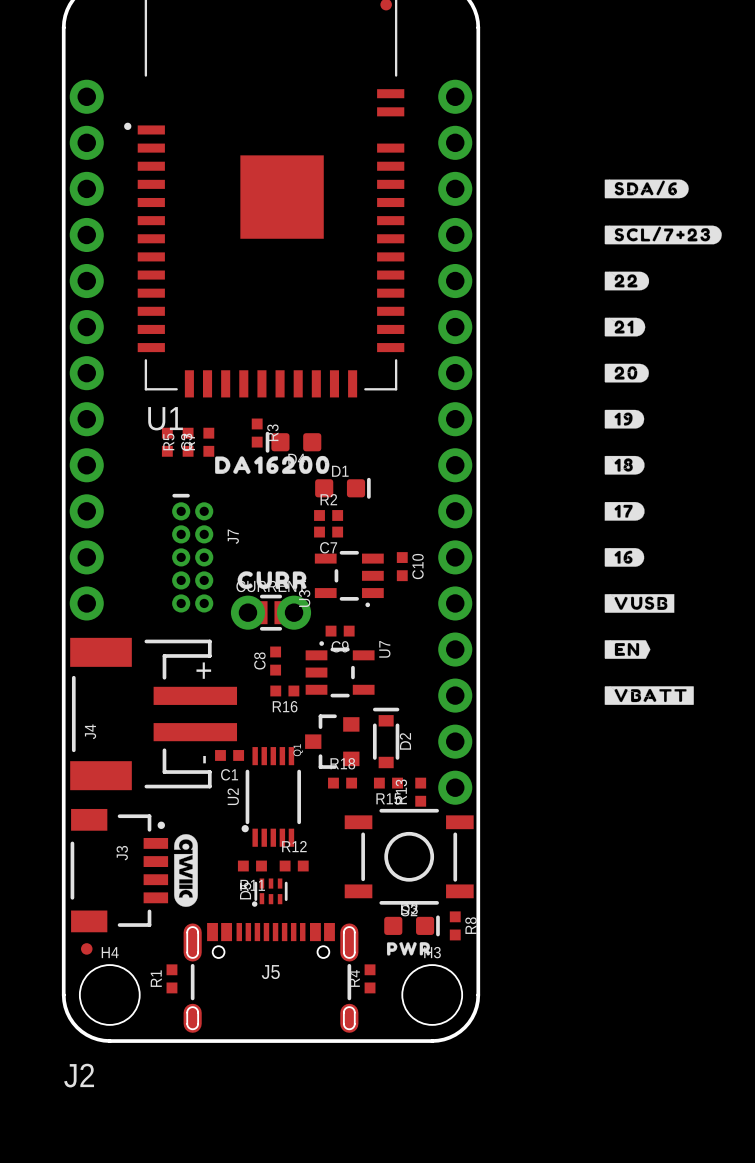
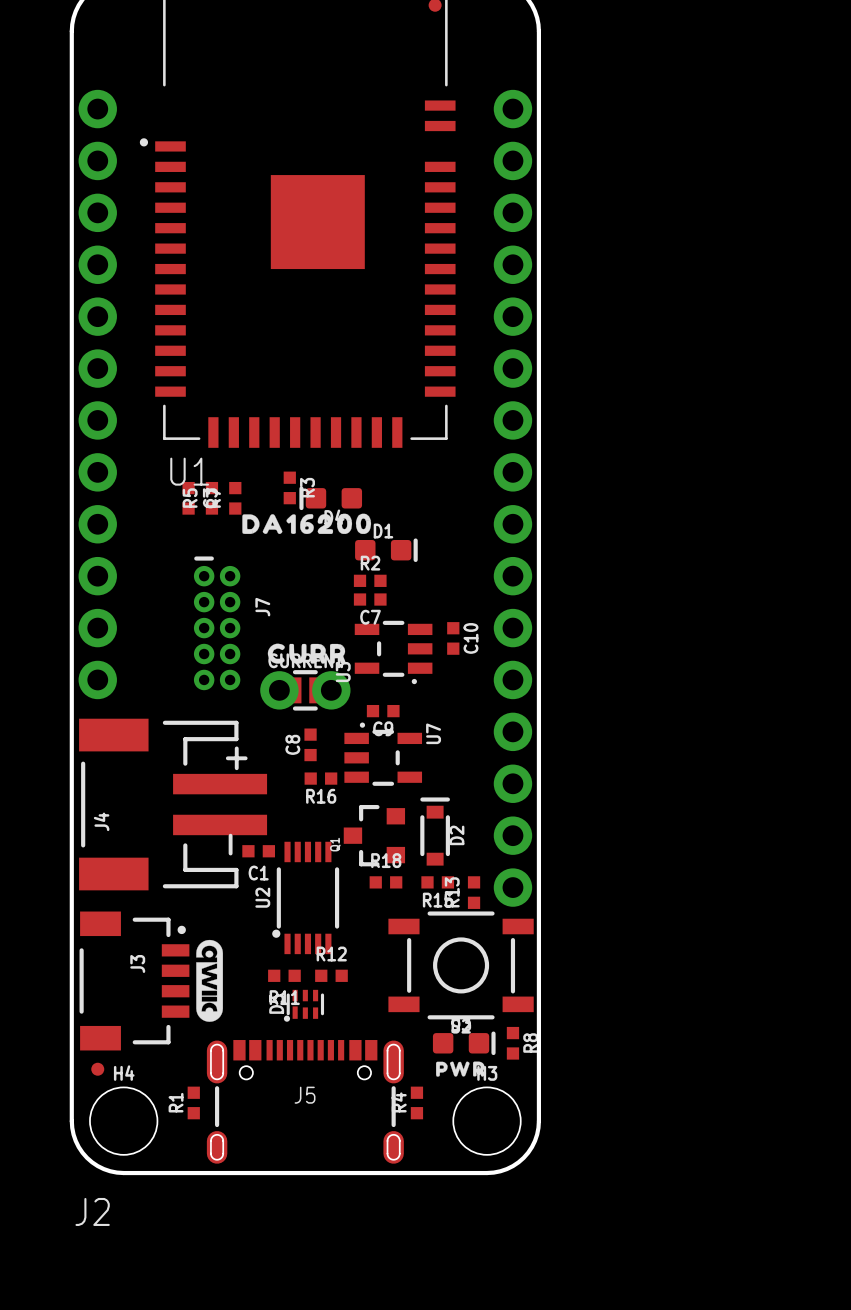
drawing: [604, 179, 689, 199] -> none
drawing: [604, 225, 722, 245] -> none
drawing: [604, 271, 650, 291] -> none
drawing: [604, 317, 646, 337] -> none
drawing: [604, 363, 649, 383] -> none
drawing: [604, 409, 645, 429] -> none
drawing: [604, 455, 645, 475] -> none
drawing: [604, 502, 645, 521] -> none
drawing: [604, 548, 645, 567] -> none
drawing: [604, 594, 675, 613] -> none
drawing: [604, 640, 651, 659] -> none
drawing: [604, 686, 694, 705] -> none

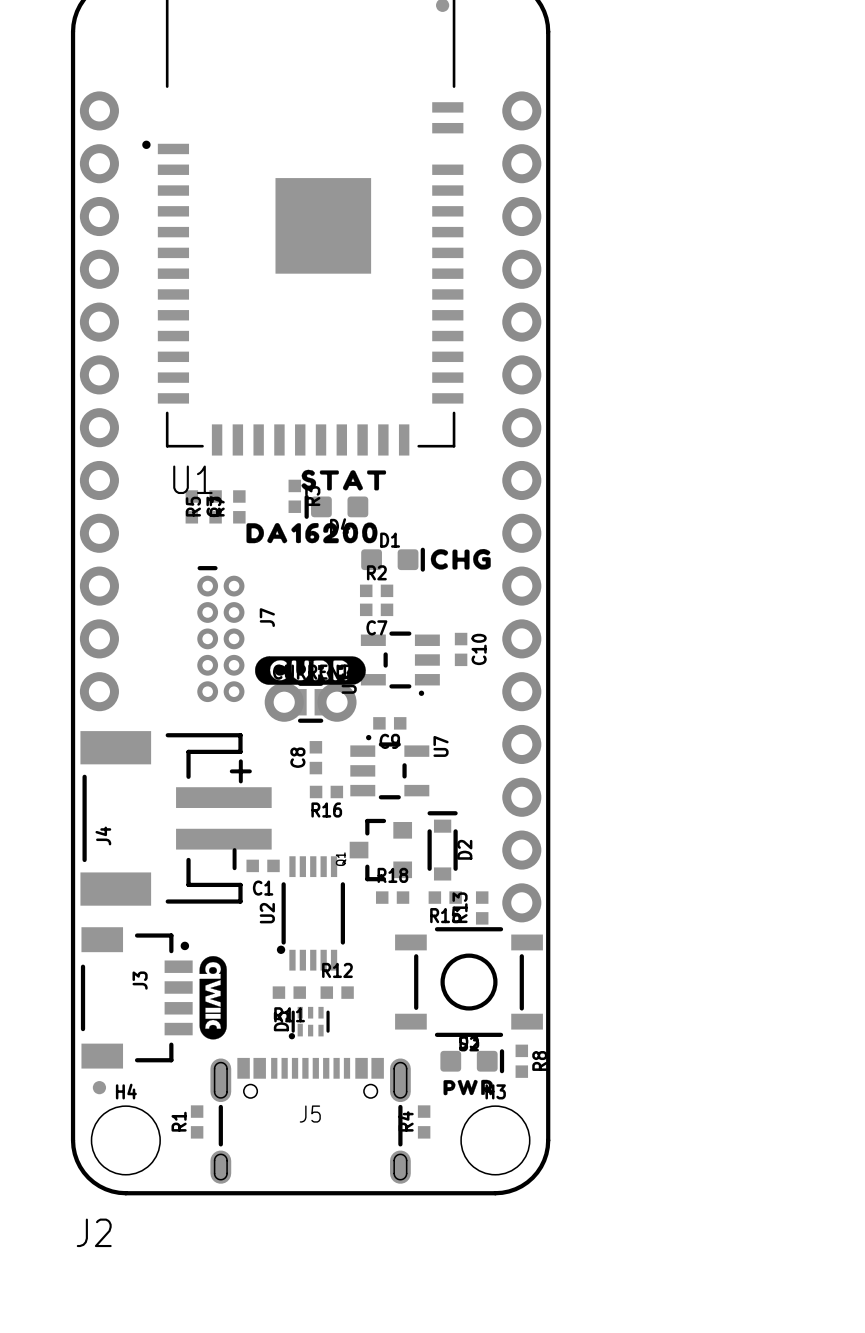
drawing: none -> [301, 469, 387, 491]
drawing: none -> [430, 548, 491, 570]
drawing shape: [267, 643, 346, 664] -> [255, 656, 366, 685]

